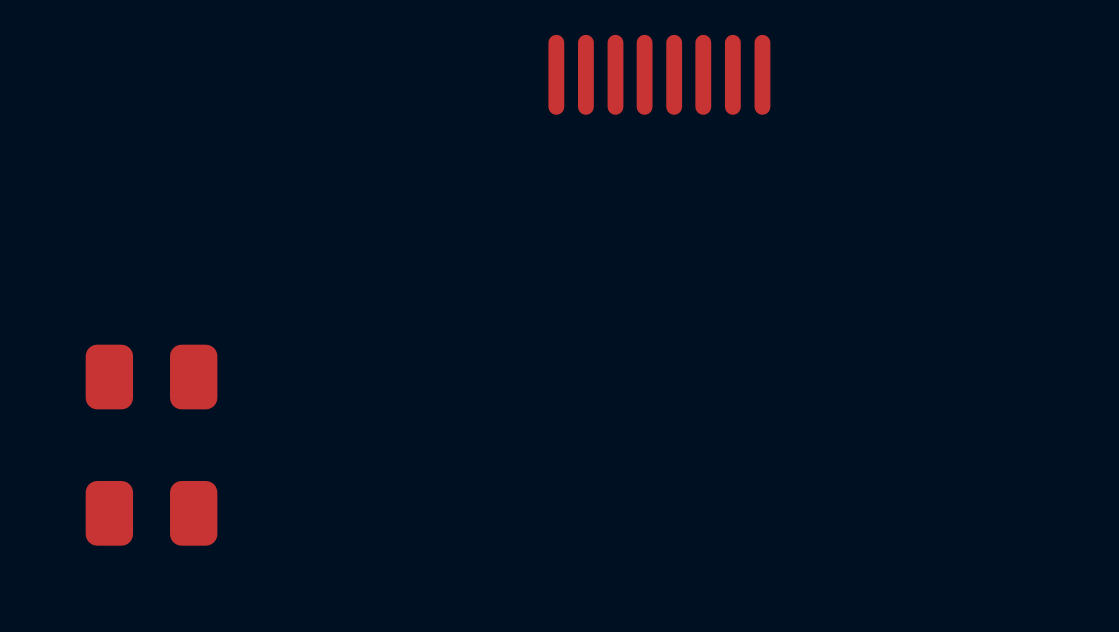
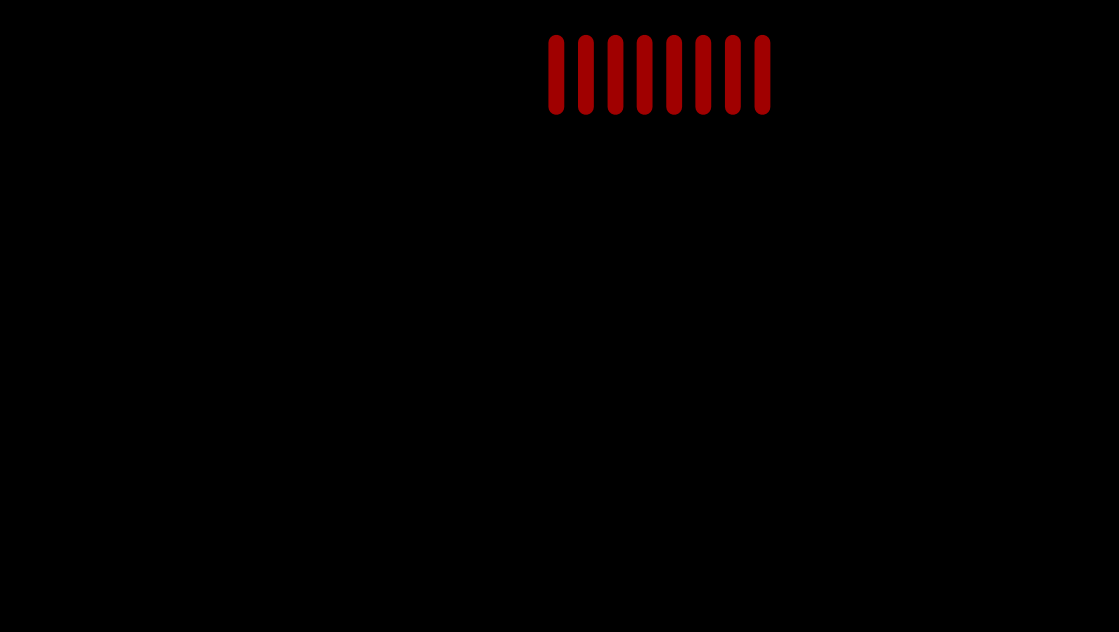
part: (151, 377) -> none
part: (151, 513) -> none

